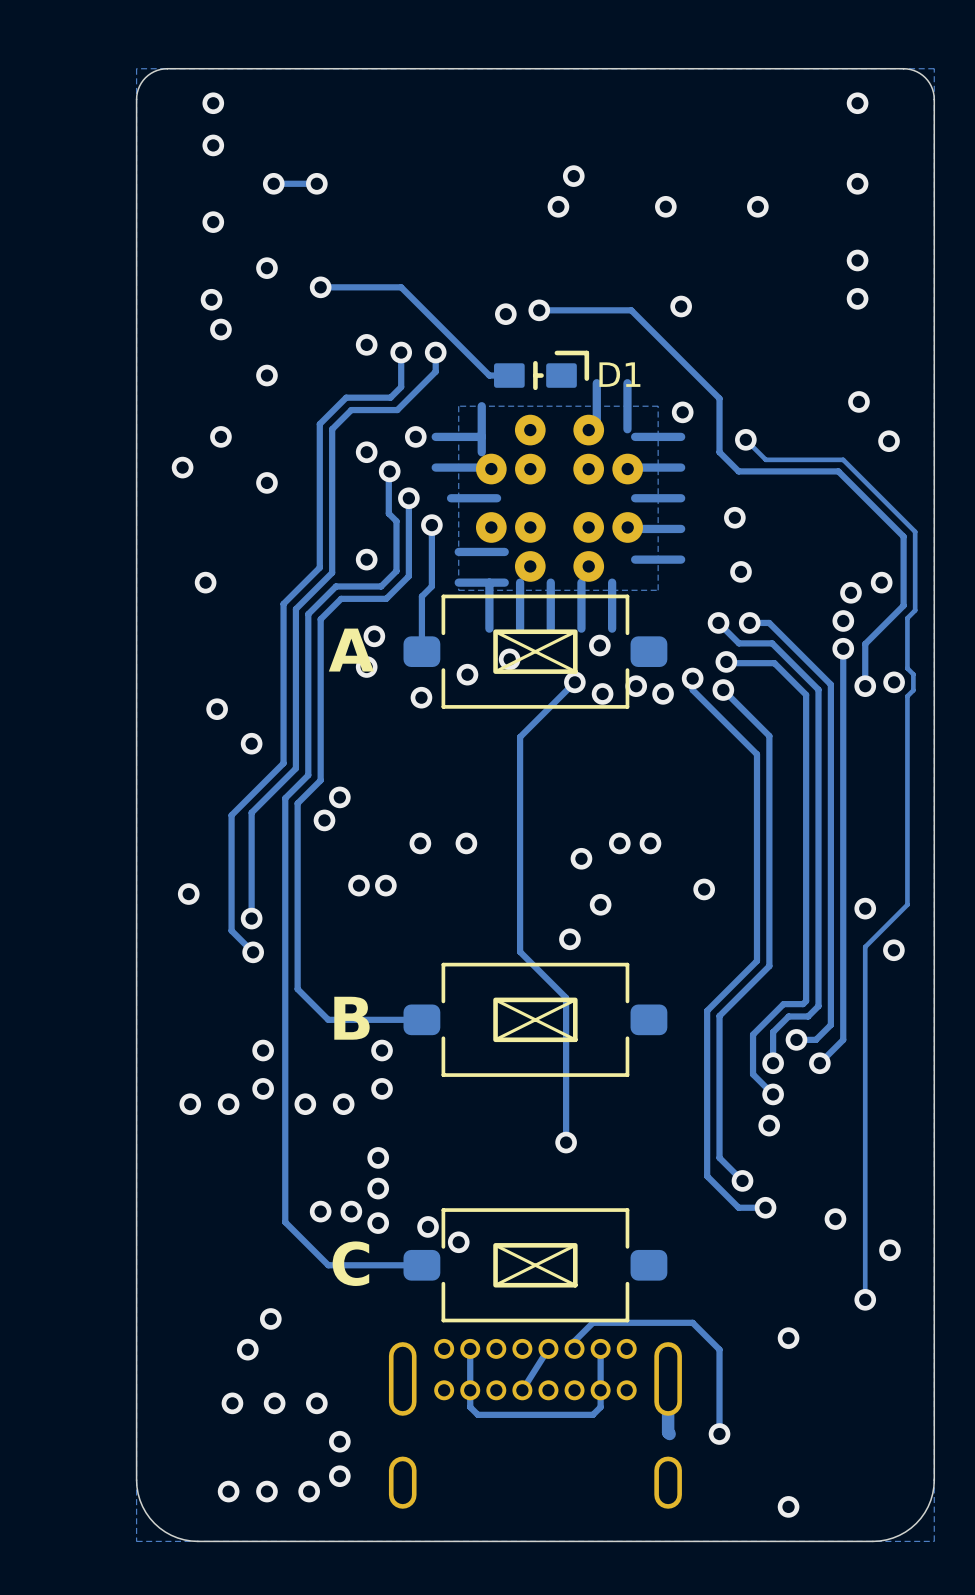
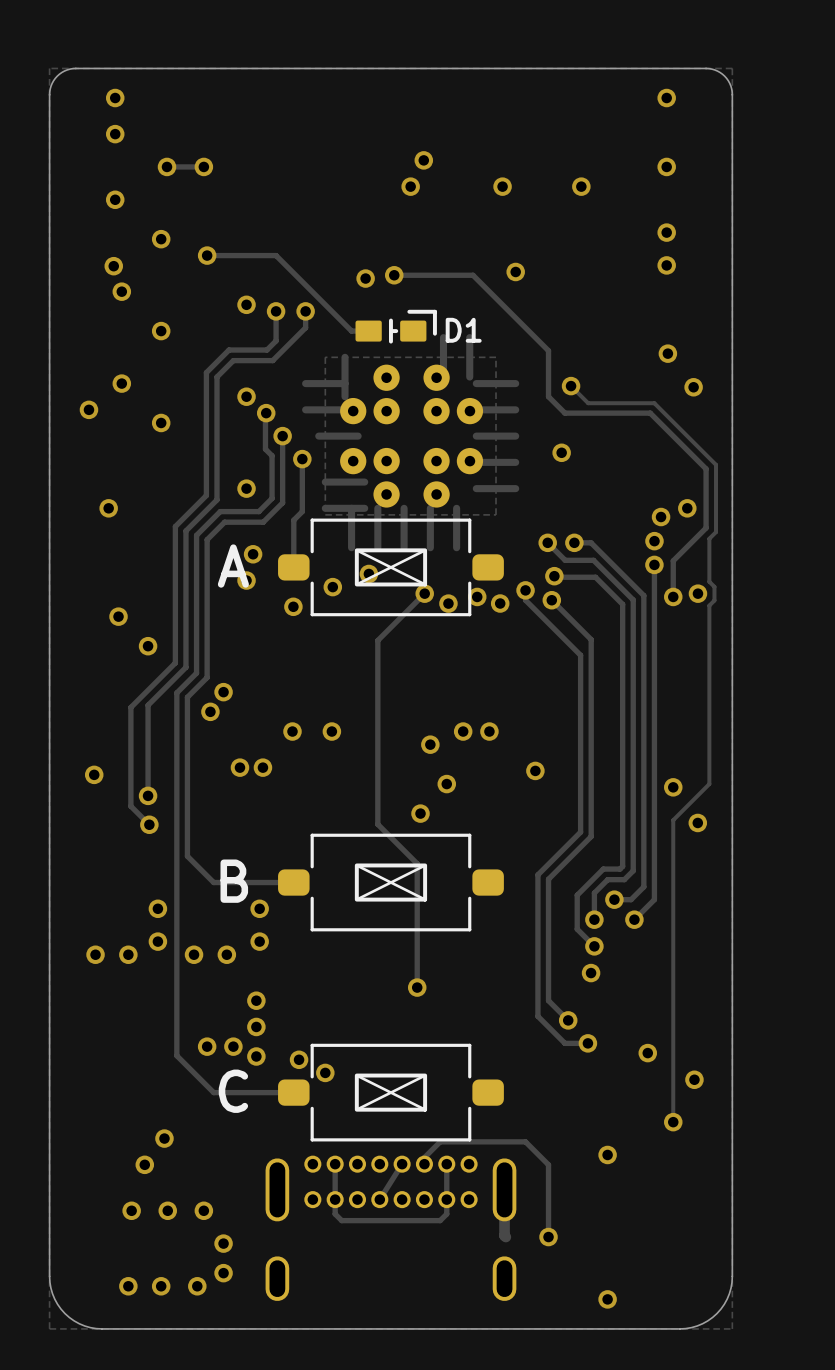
via: (682, 412) -> none
via: (415, 436) -> none
via: (740, 571) -> none
via: (599, 645) -> none

